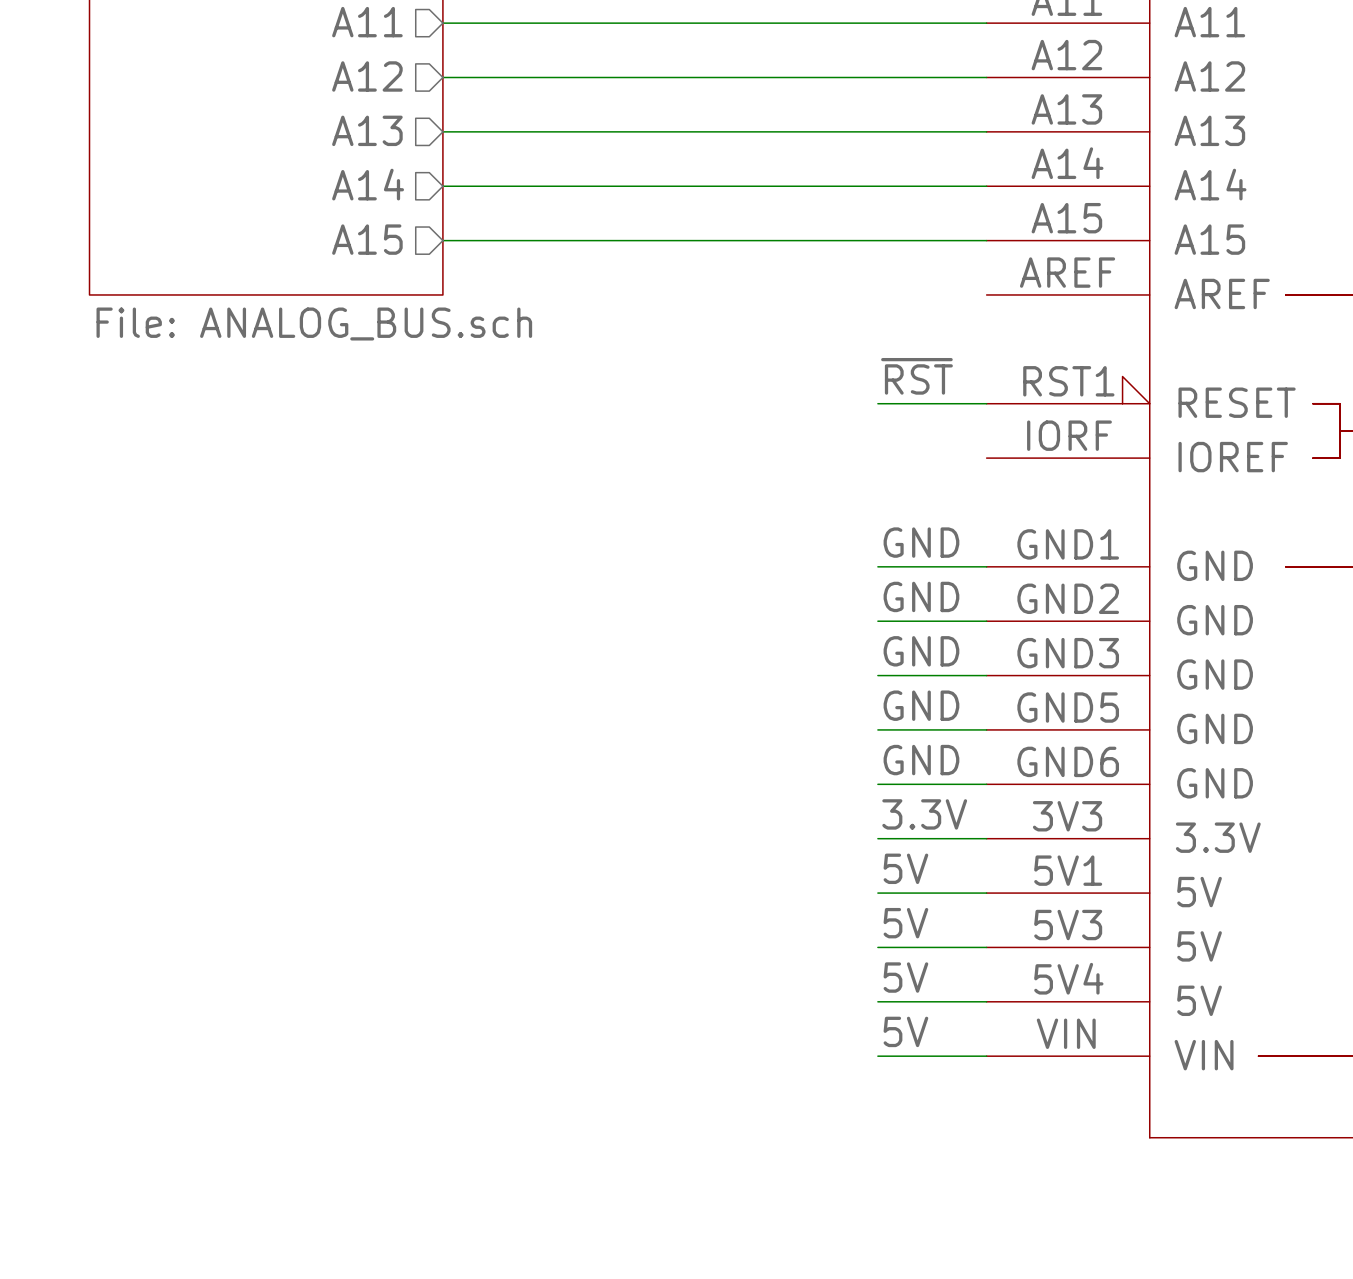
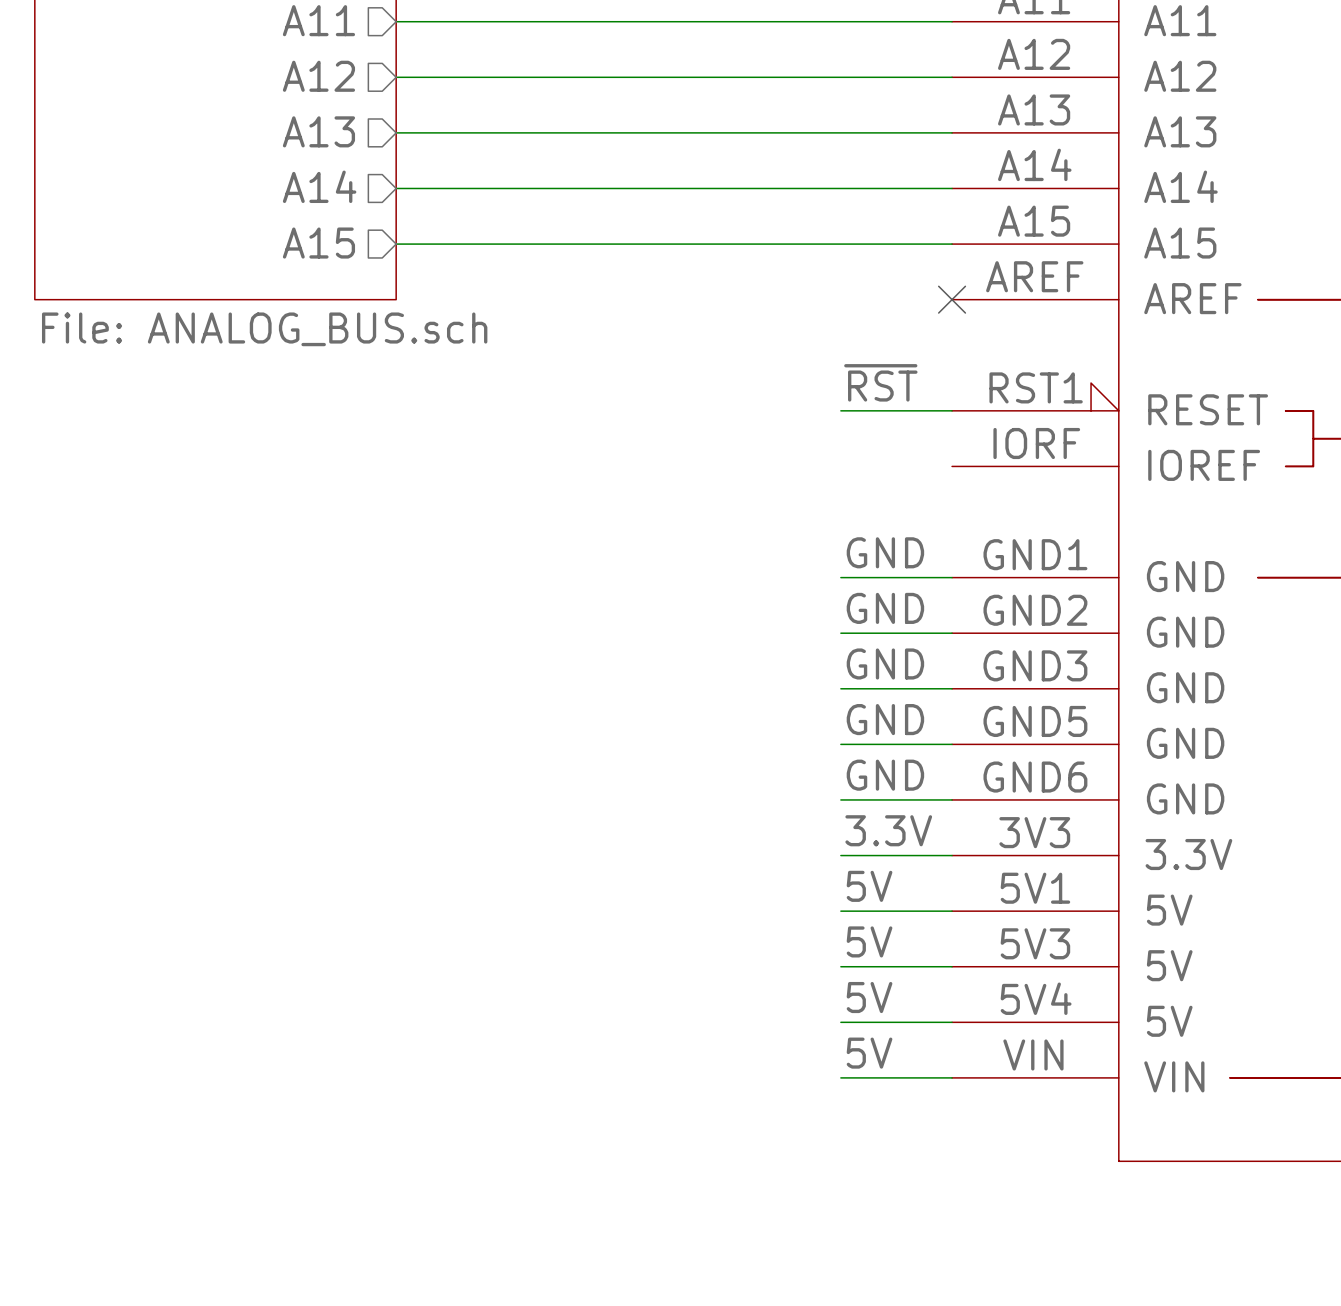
no-connect mark: none -> (952, 299)

